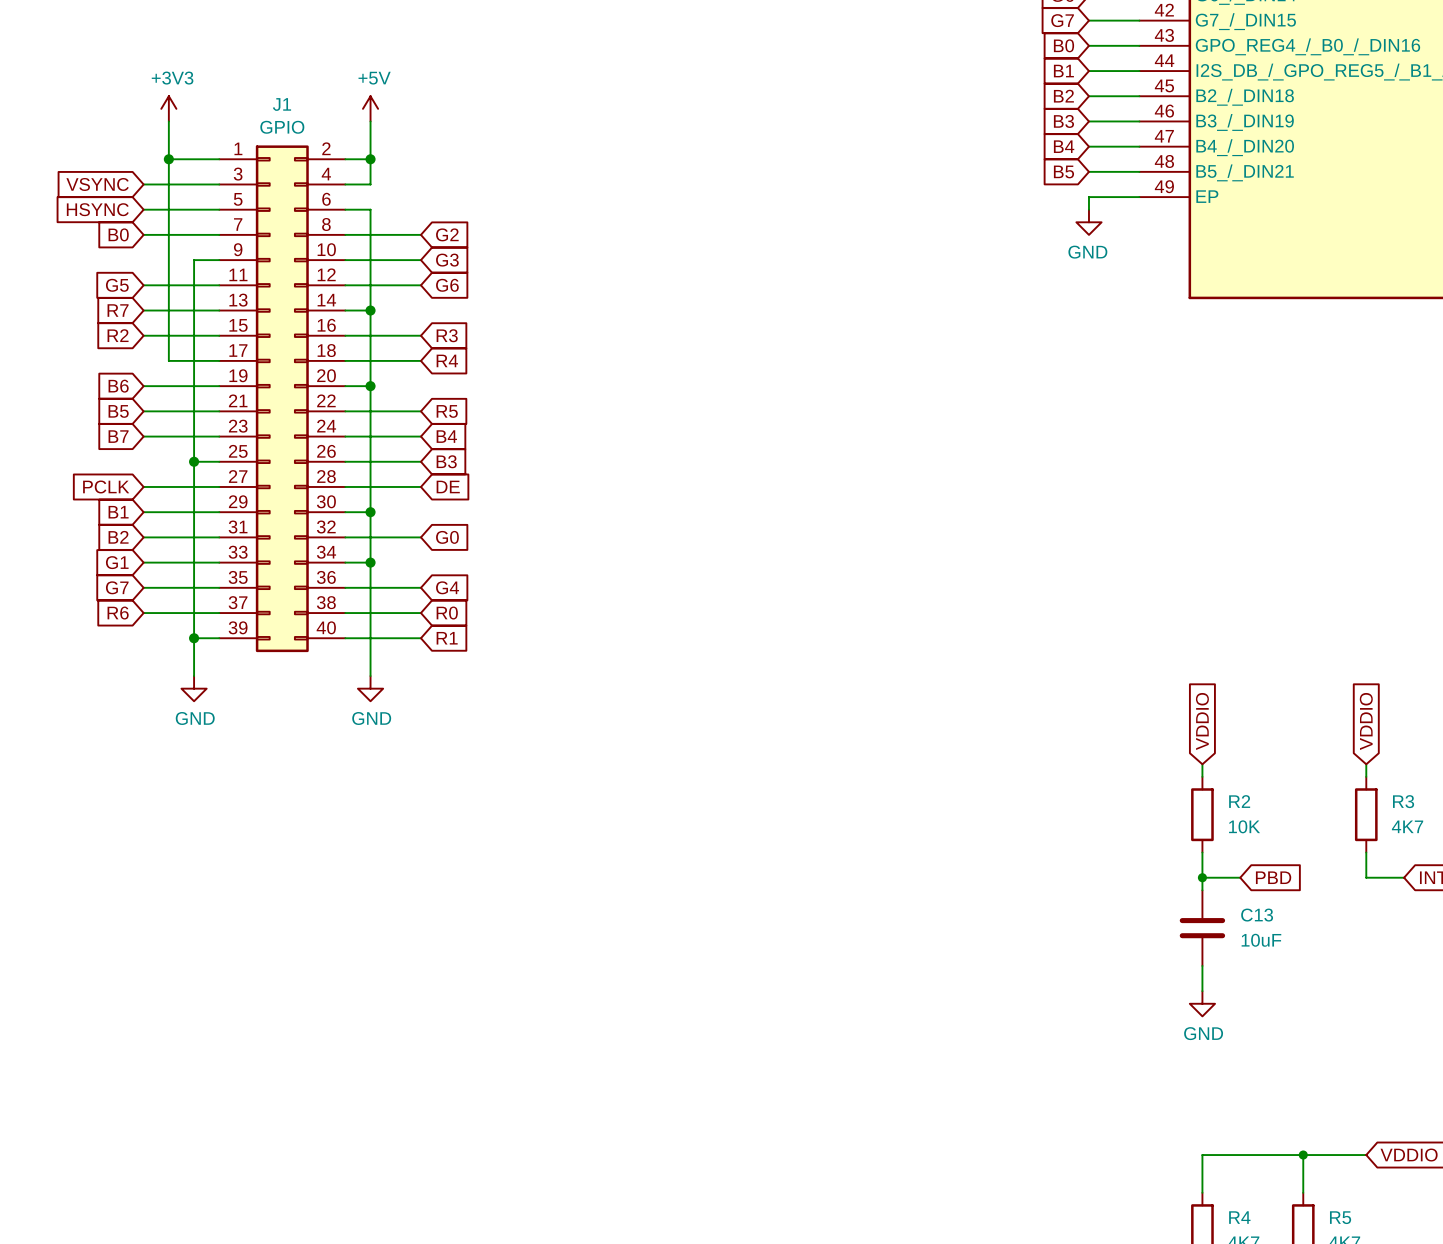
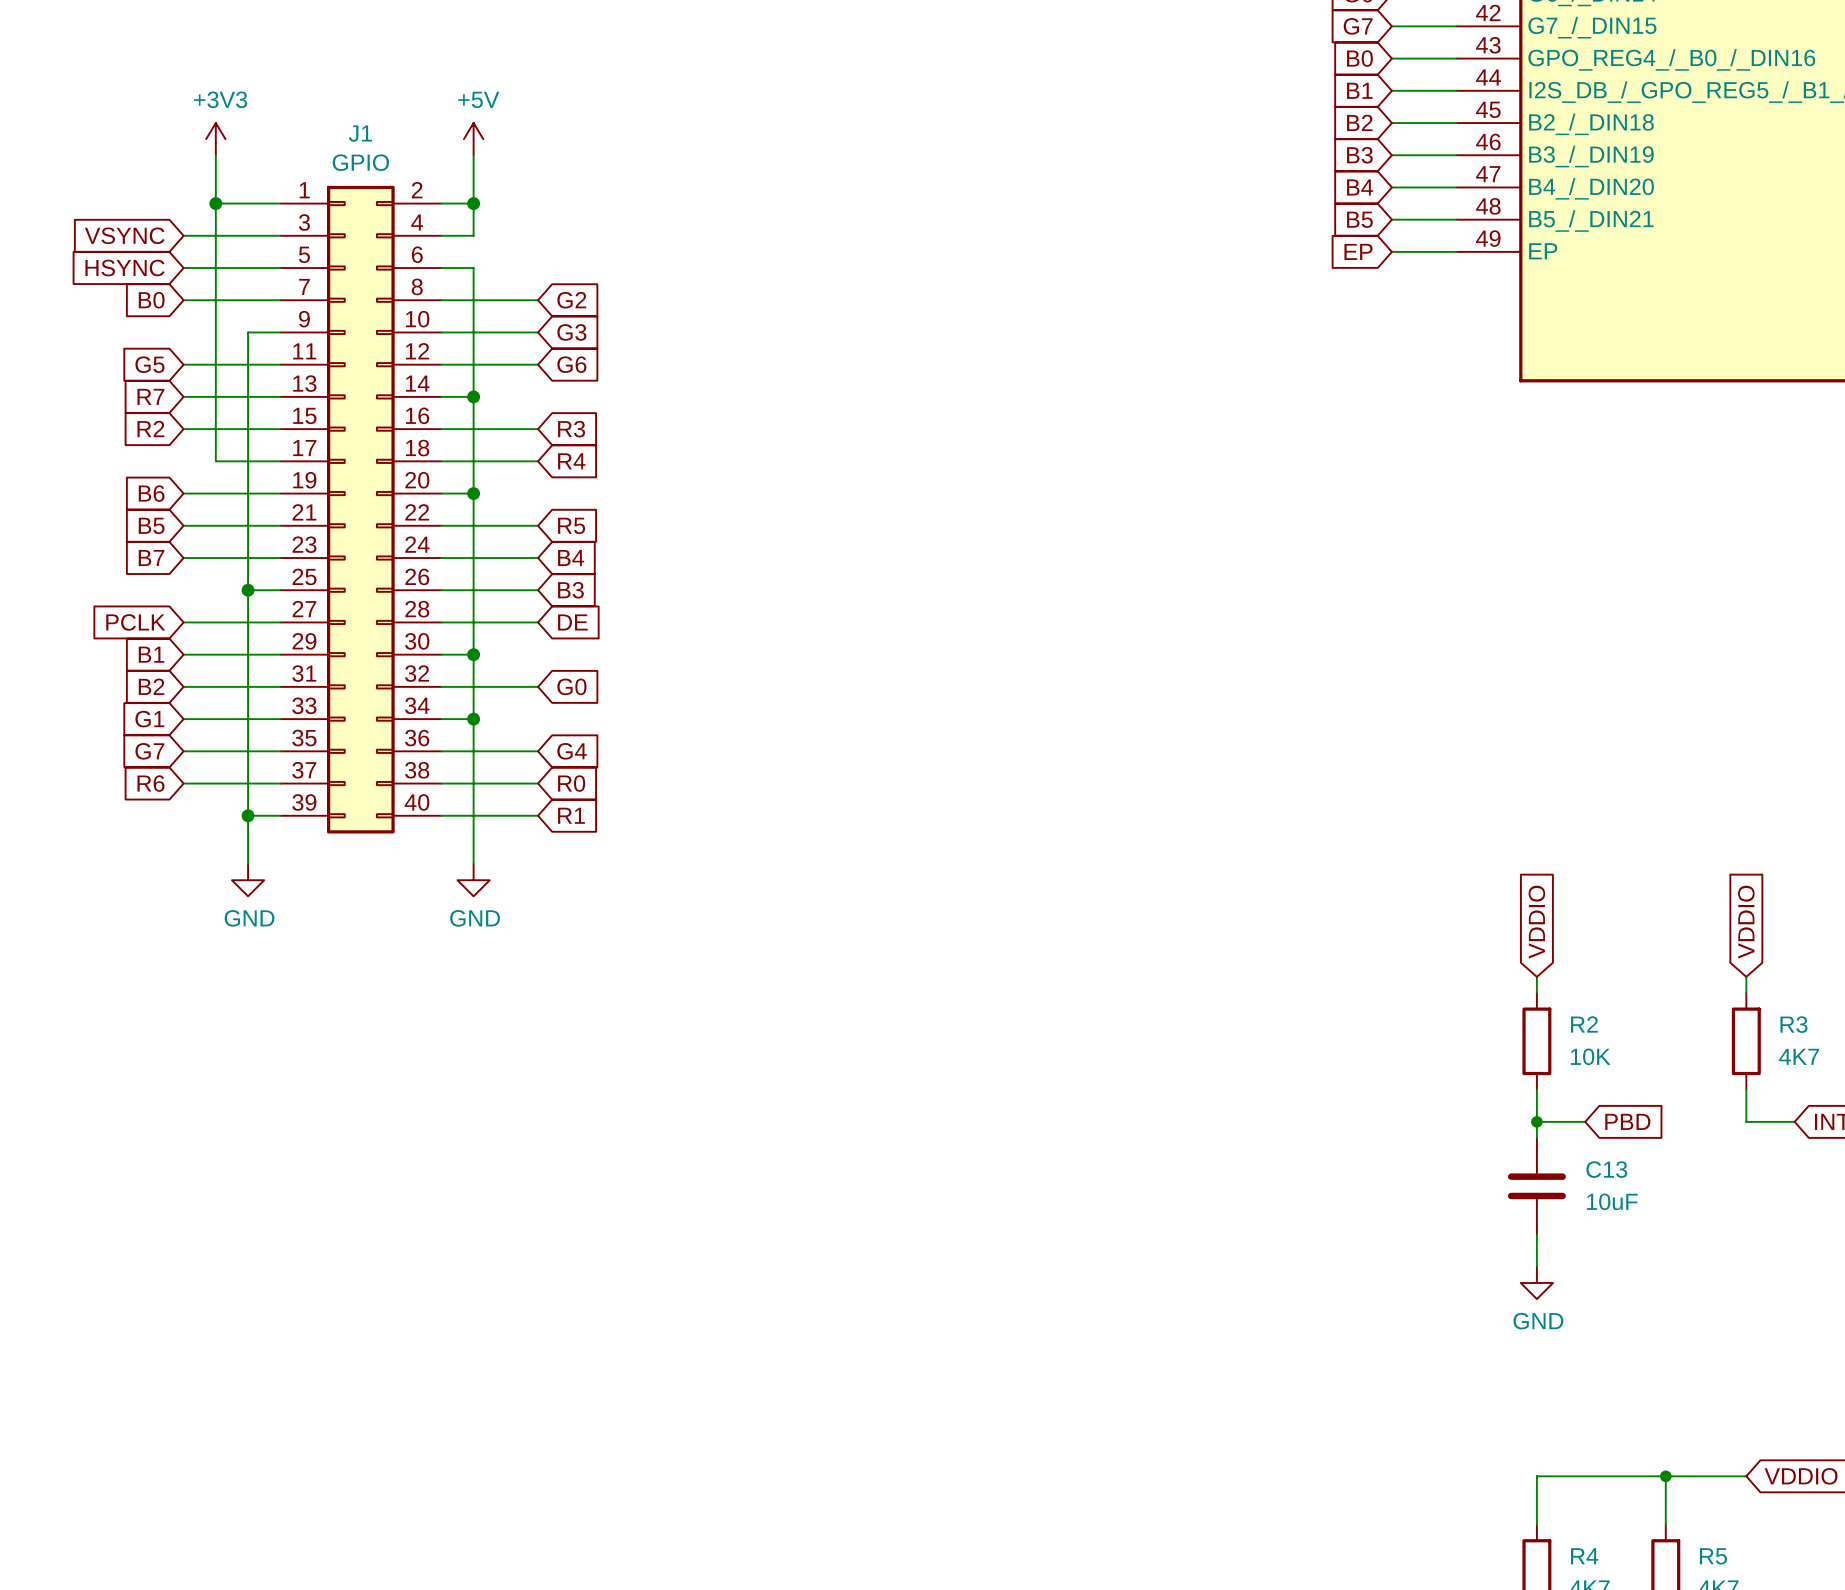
global label: none -> EP (1358, 251)
wire: (1088, 197) (1088, 209) -> none
power symbol: GND (1088, 222) -> none

